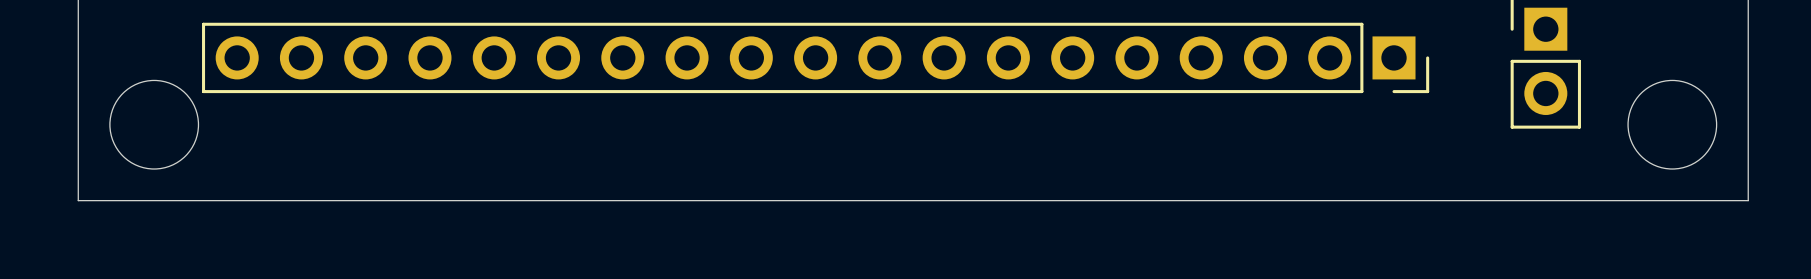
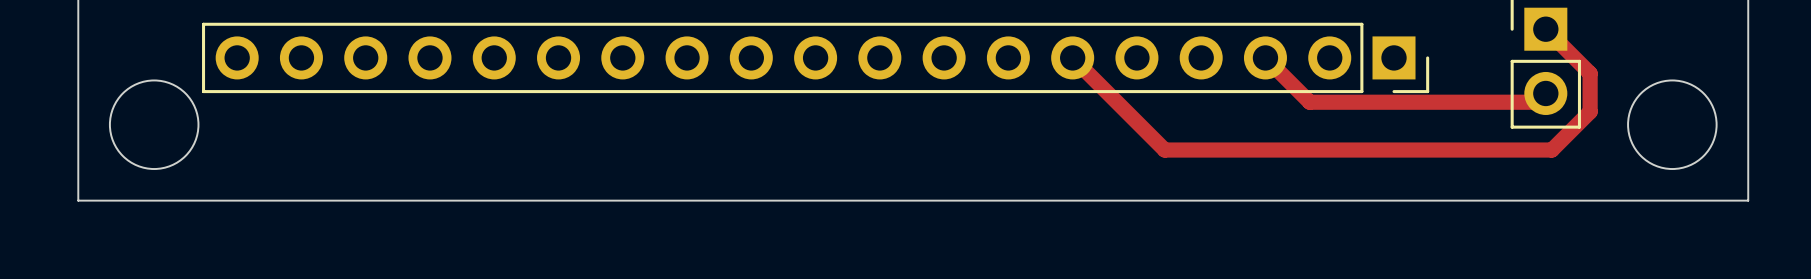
track: none -> (1545, 29) (1590, 73) (1590, 111) (1551, 150) (1164, 150) (1072, 57)
track: none -> (1265, 57) (1309, 102) (1537, 102) (1545, 93)

